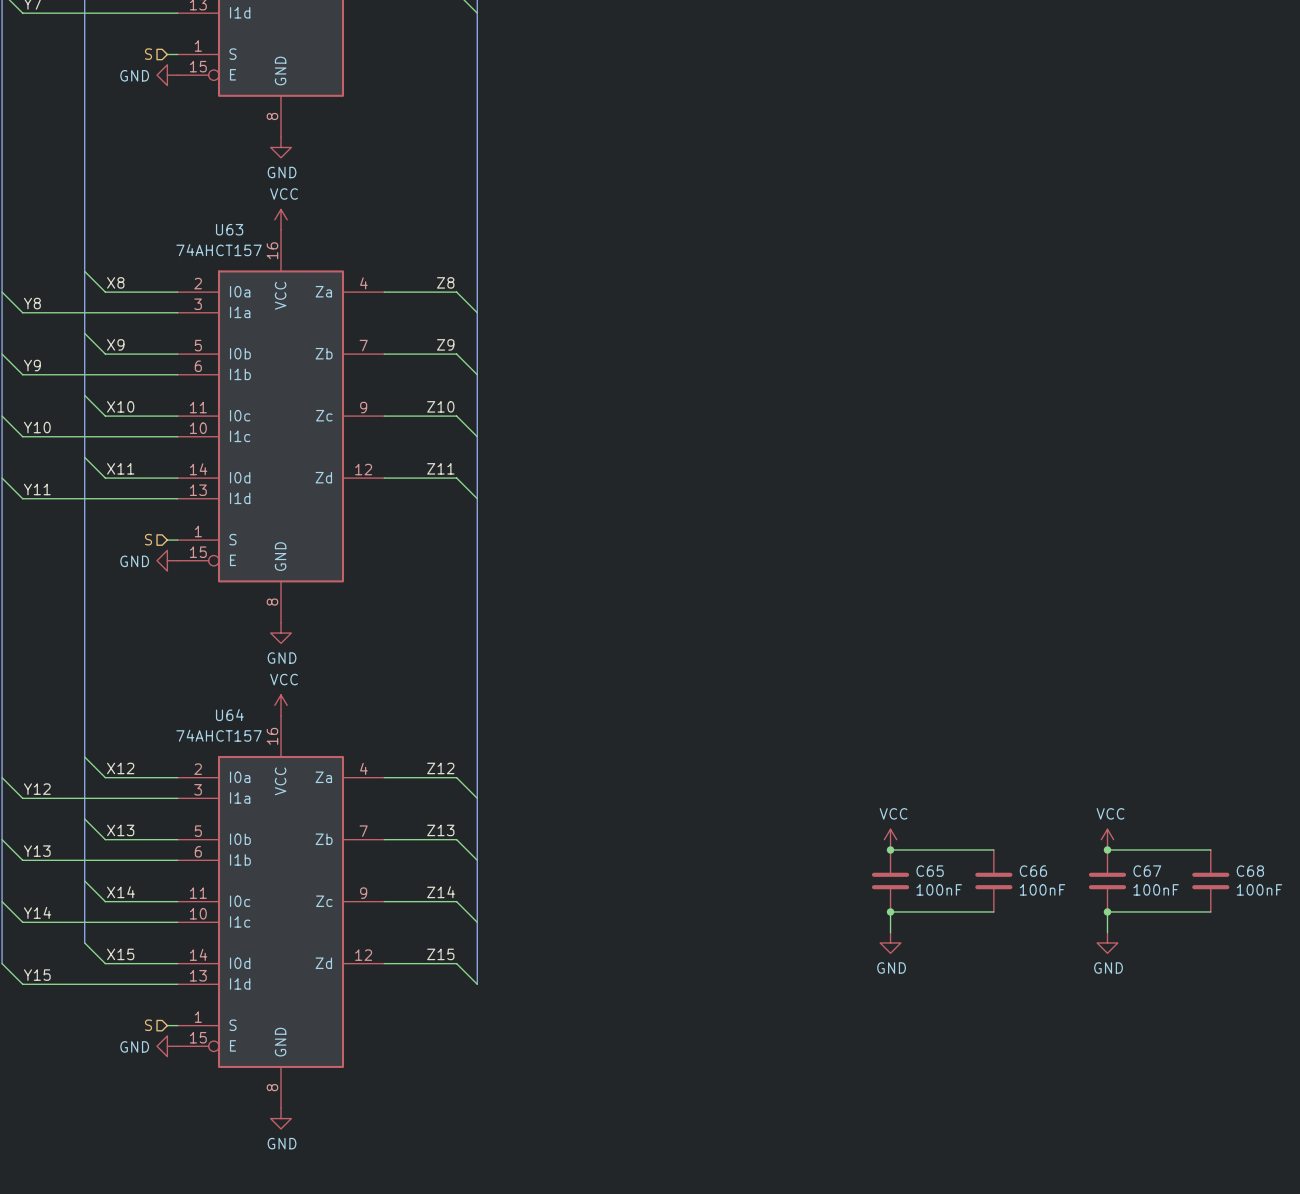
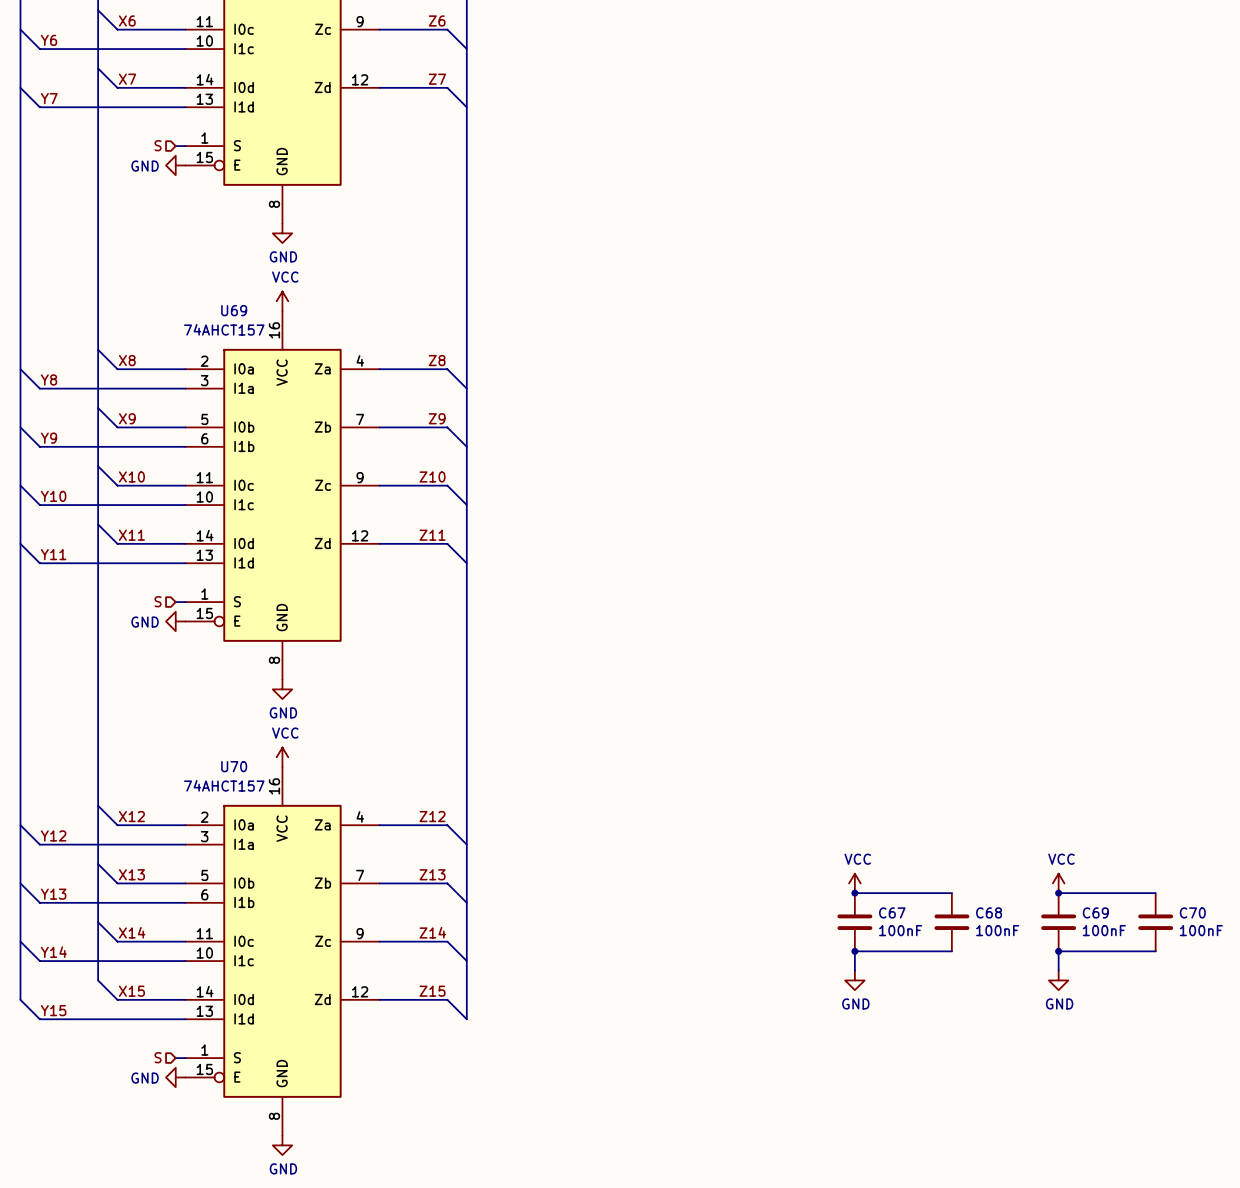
U63 name: U63 (229, 229) -> U69 (234, 310)
U64 name: U64 (229, 715) -> U70 (234, 766)
C65 name: C65 (930, 871) -> C67 (892, 912)
C66 name: C66 (1033, 871) -> C68 (989, 912)
C67 name: C67 (1147, 871) -> C69 (1095, 912)
C68 name: C68 (1250, 871) -> C70 (1192, 912)

